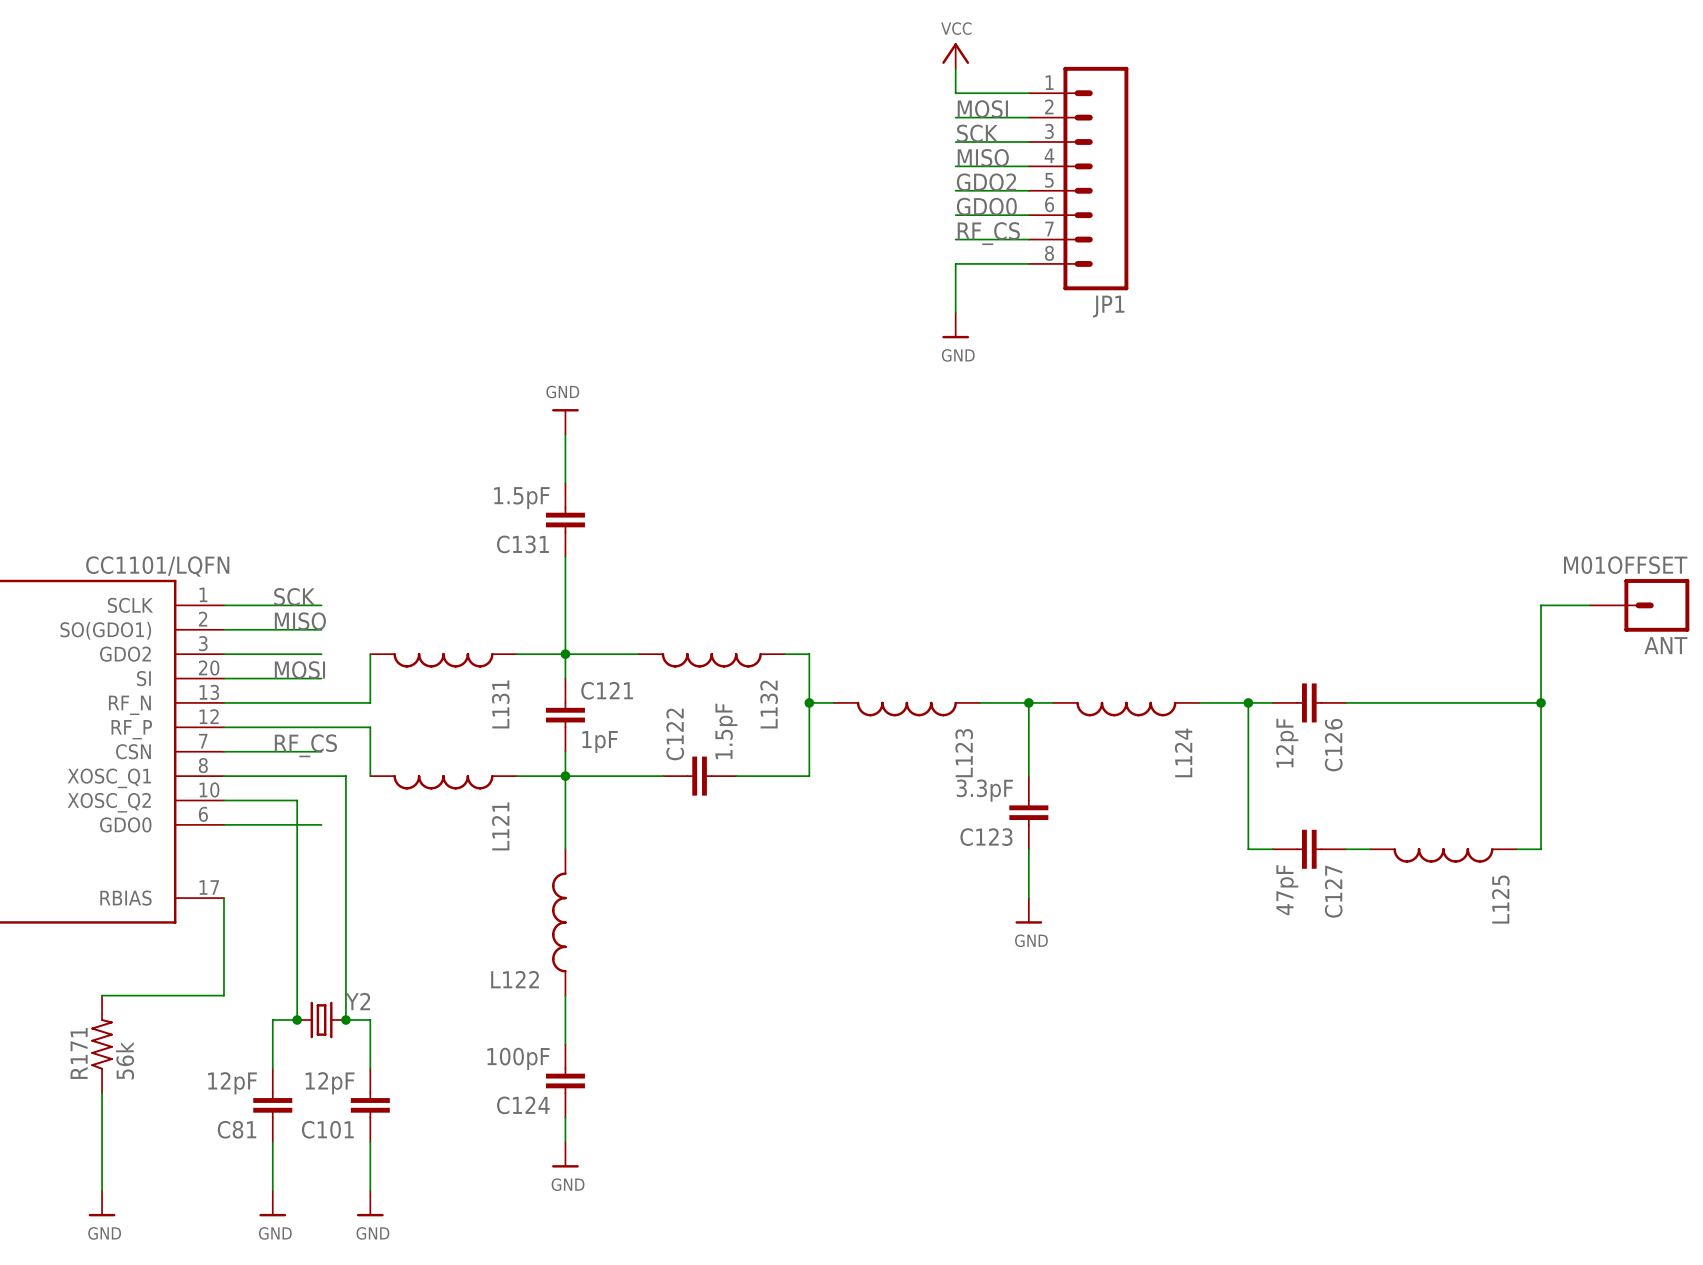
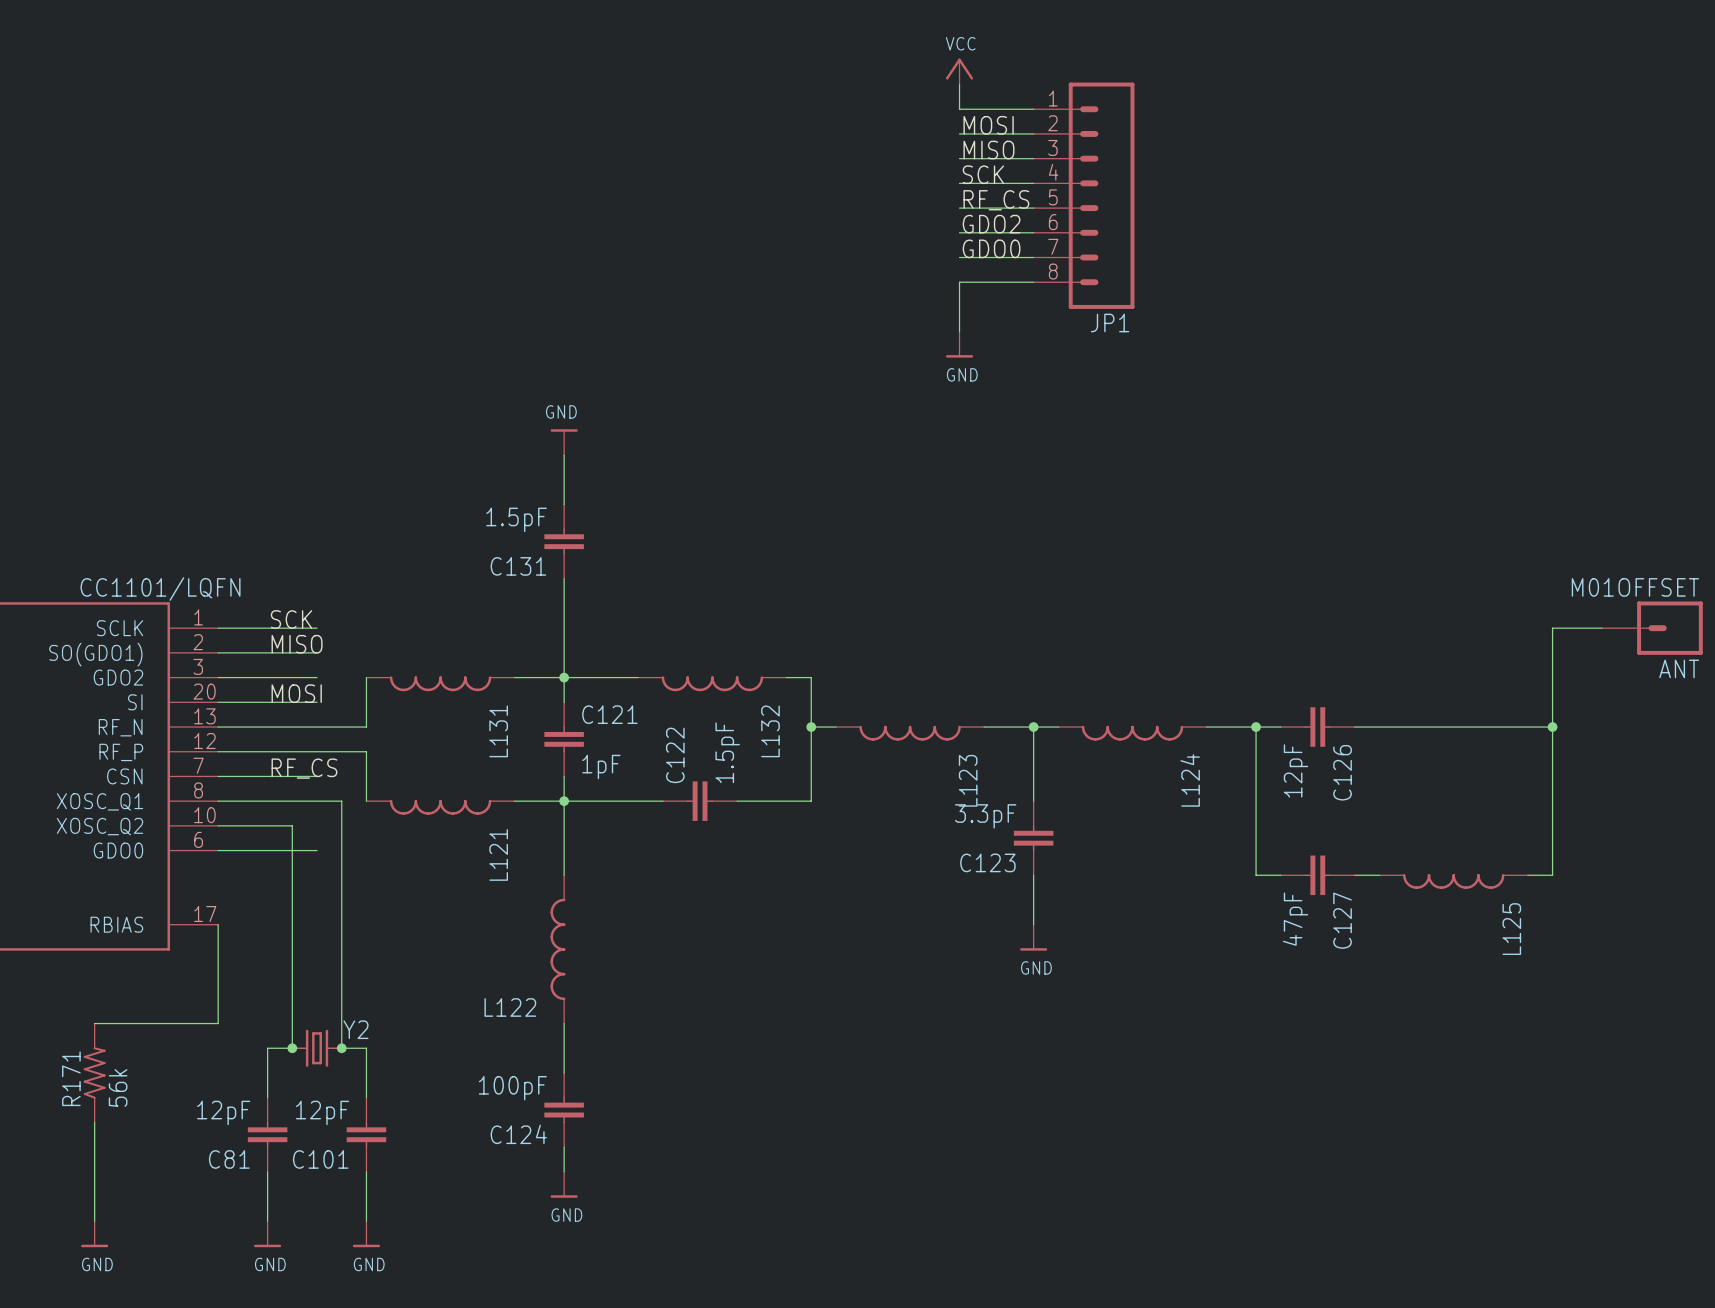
label: SCK (977, 133) -> MISO (988, 150)
label: MISO (983, 157) -> SCK (983, 174)
label: GDO2 (986, 182) -> RF_CS (996, 200)
label: GDO0 (986, 206) -> GDO2 (991, 224)
label: RF_CS (988, 233) -> GDO0 (991, 248)

